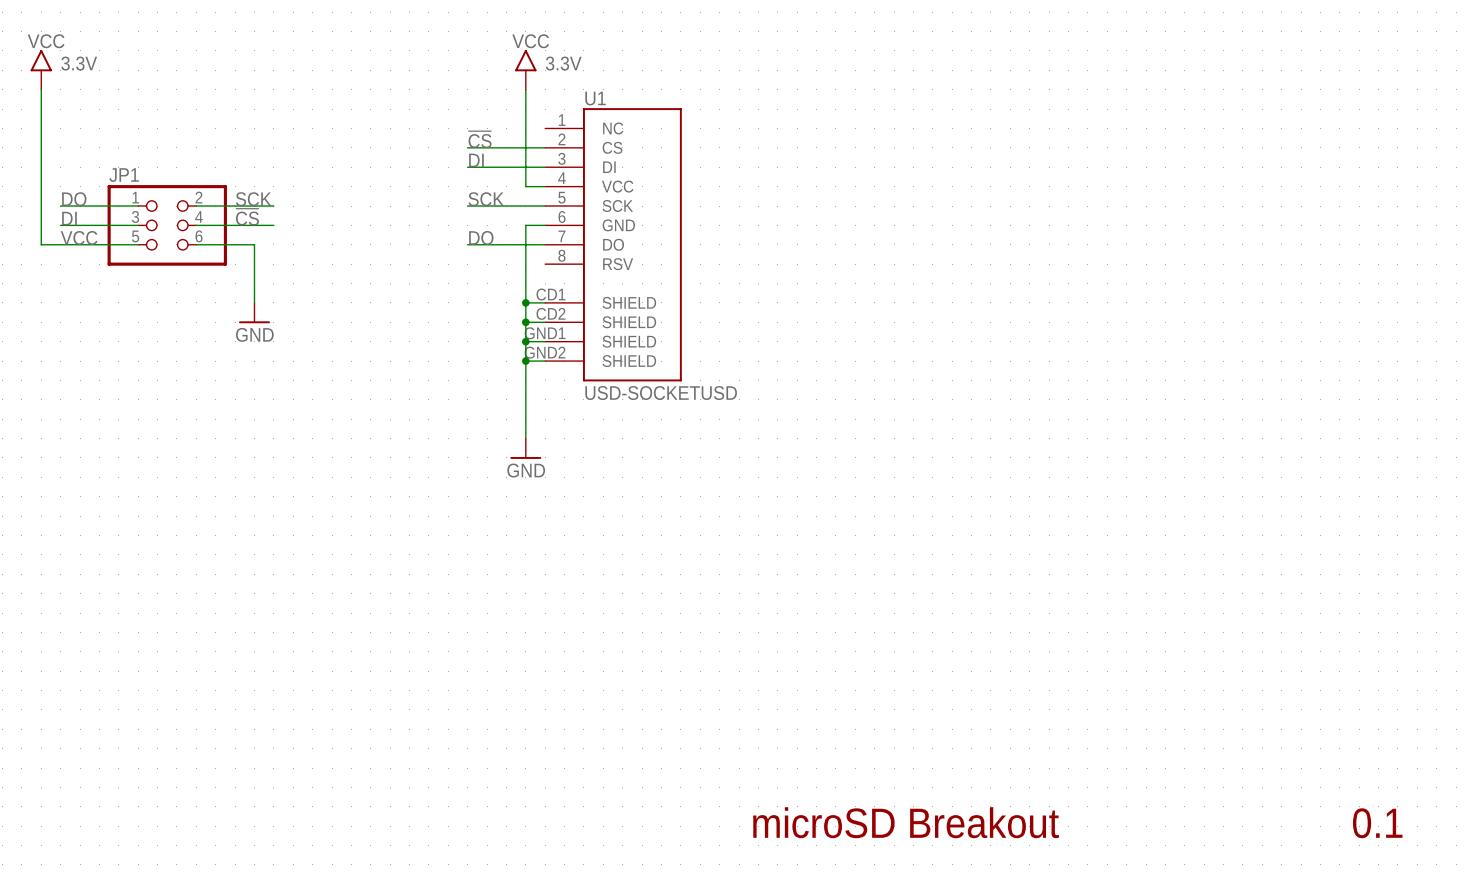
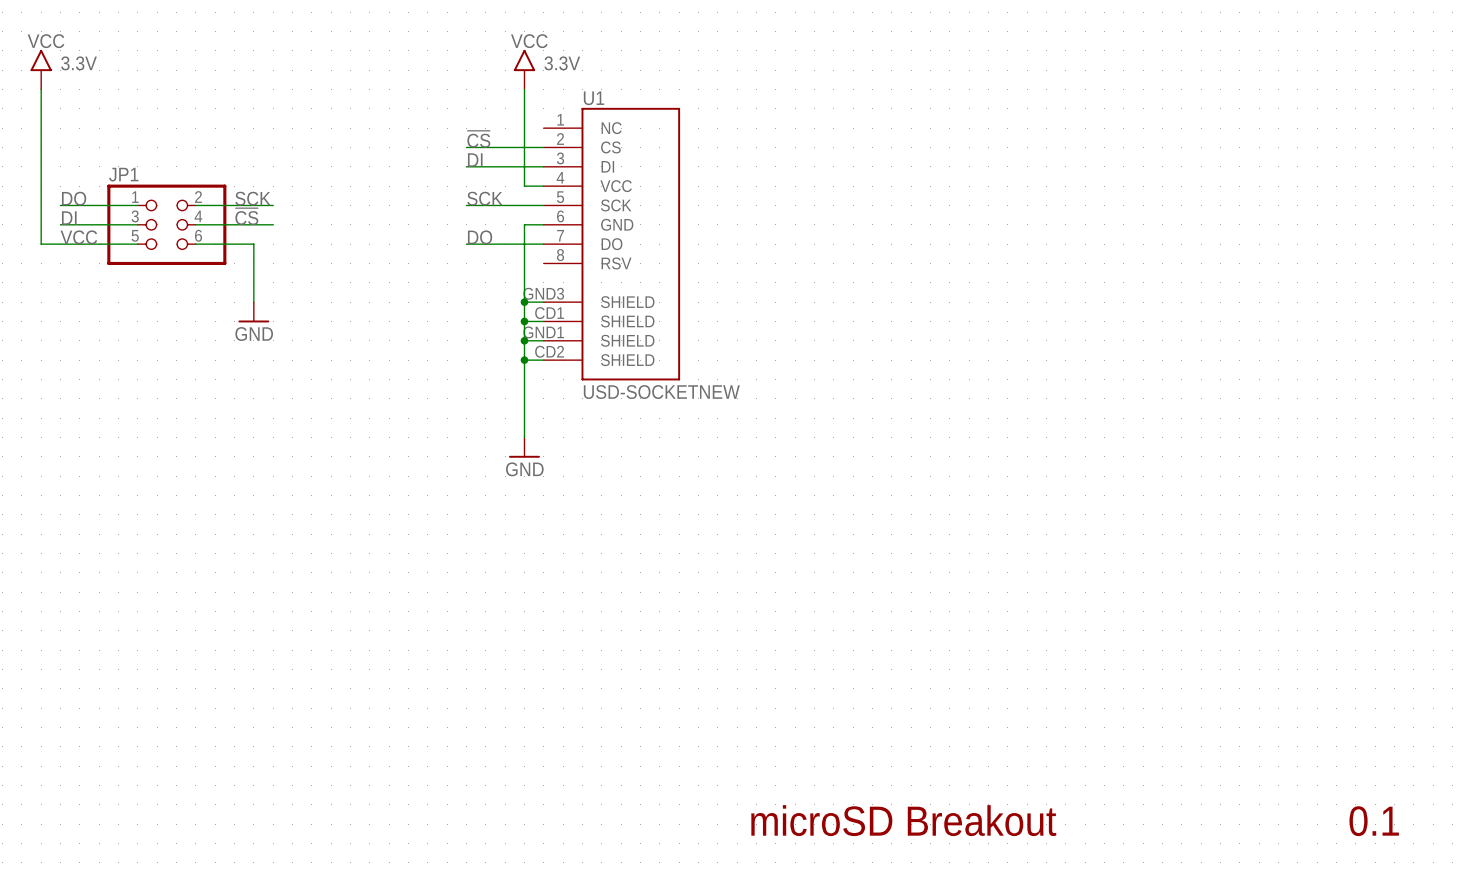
U1 pin number: CD1 (550, 294) -> GND3 (543, 293)
U1 pin number: CD2 (550, 313) -> CD1 (549, 313)
U1 pin number: GND2 (545, 352) -> CD2 (549, 351)
U1 value: USD-SOCKETUSD (661, 393) -> USD-SOCKETNEW (661, 392)

